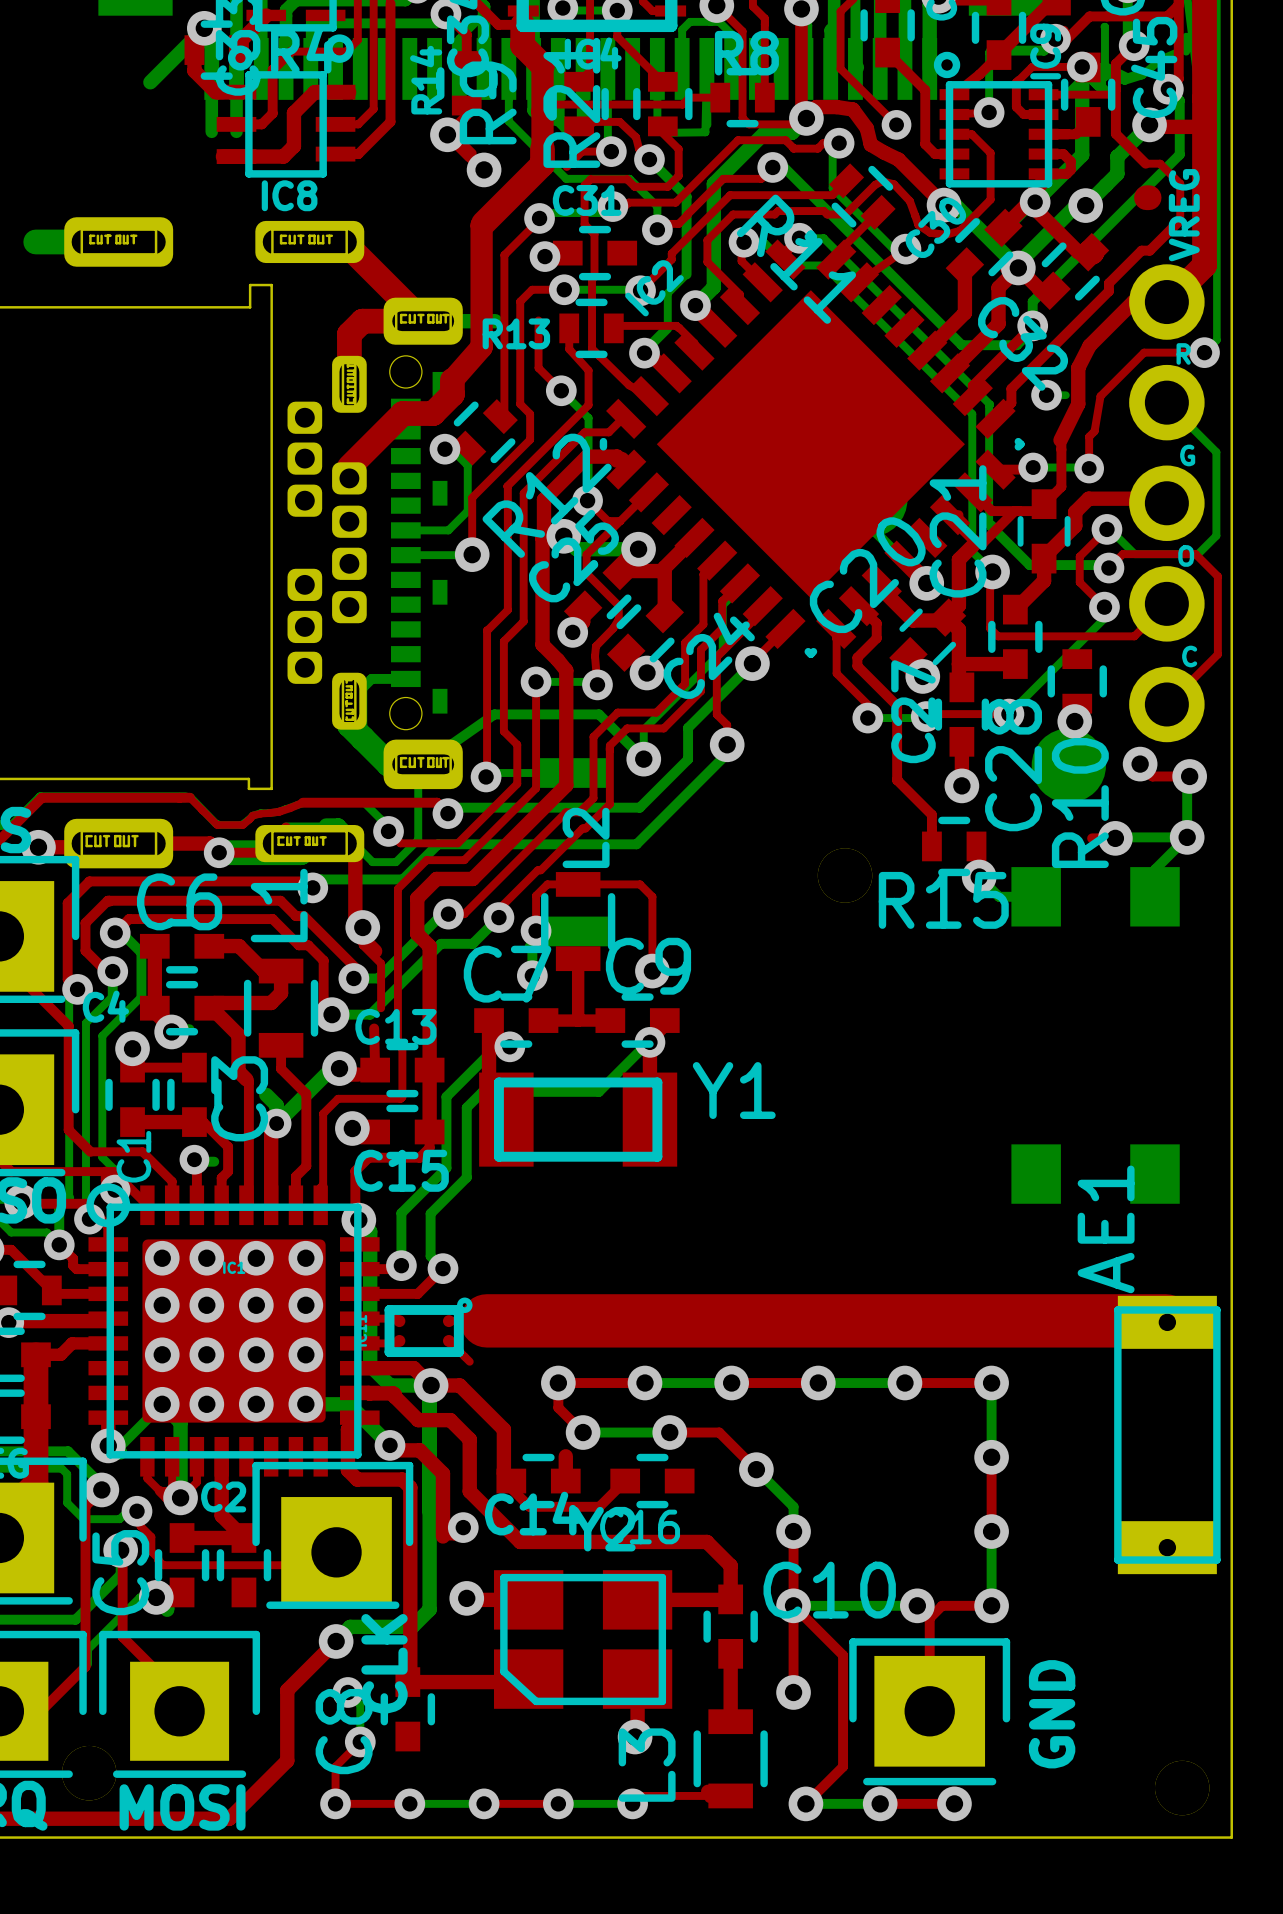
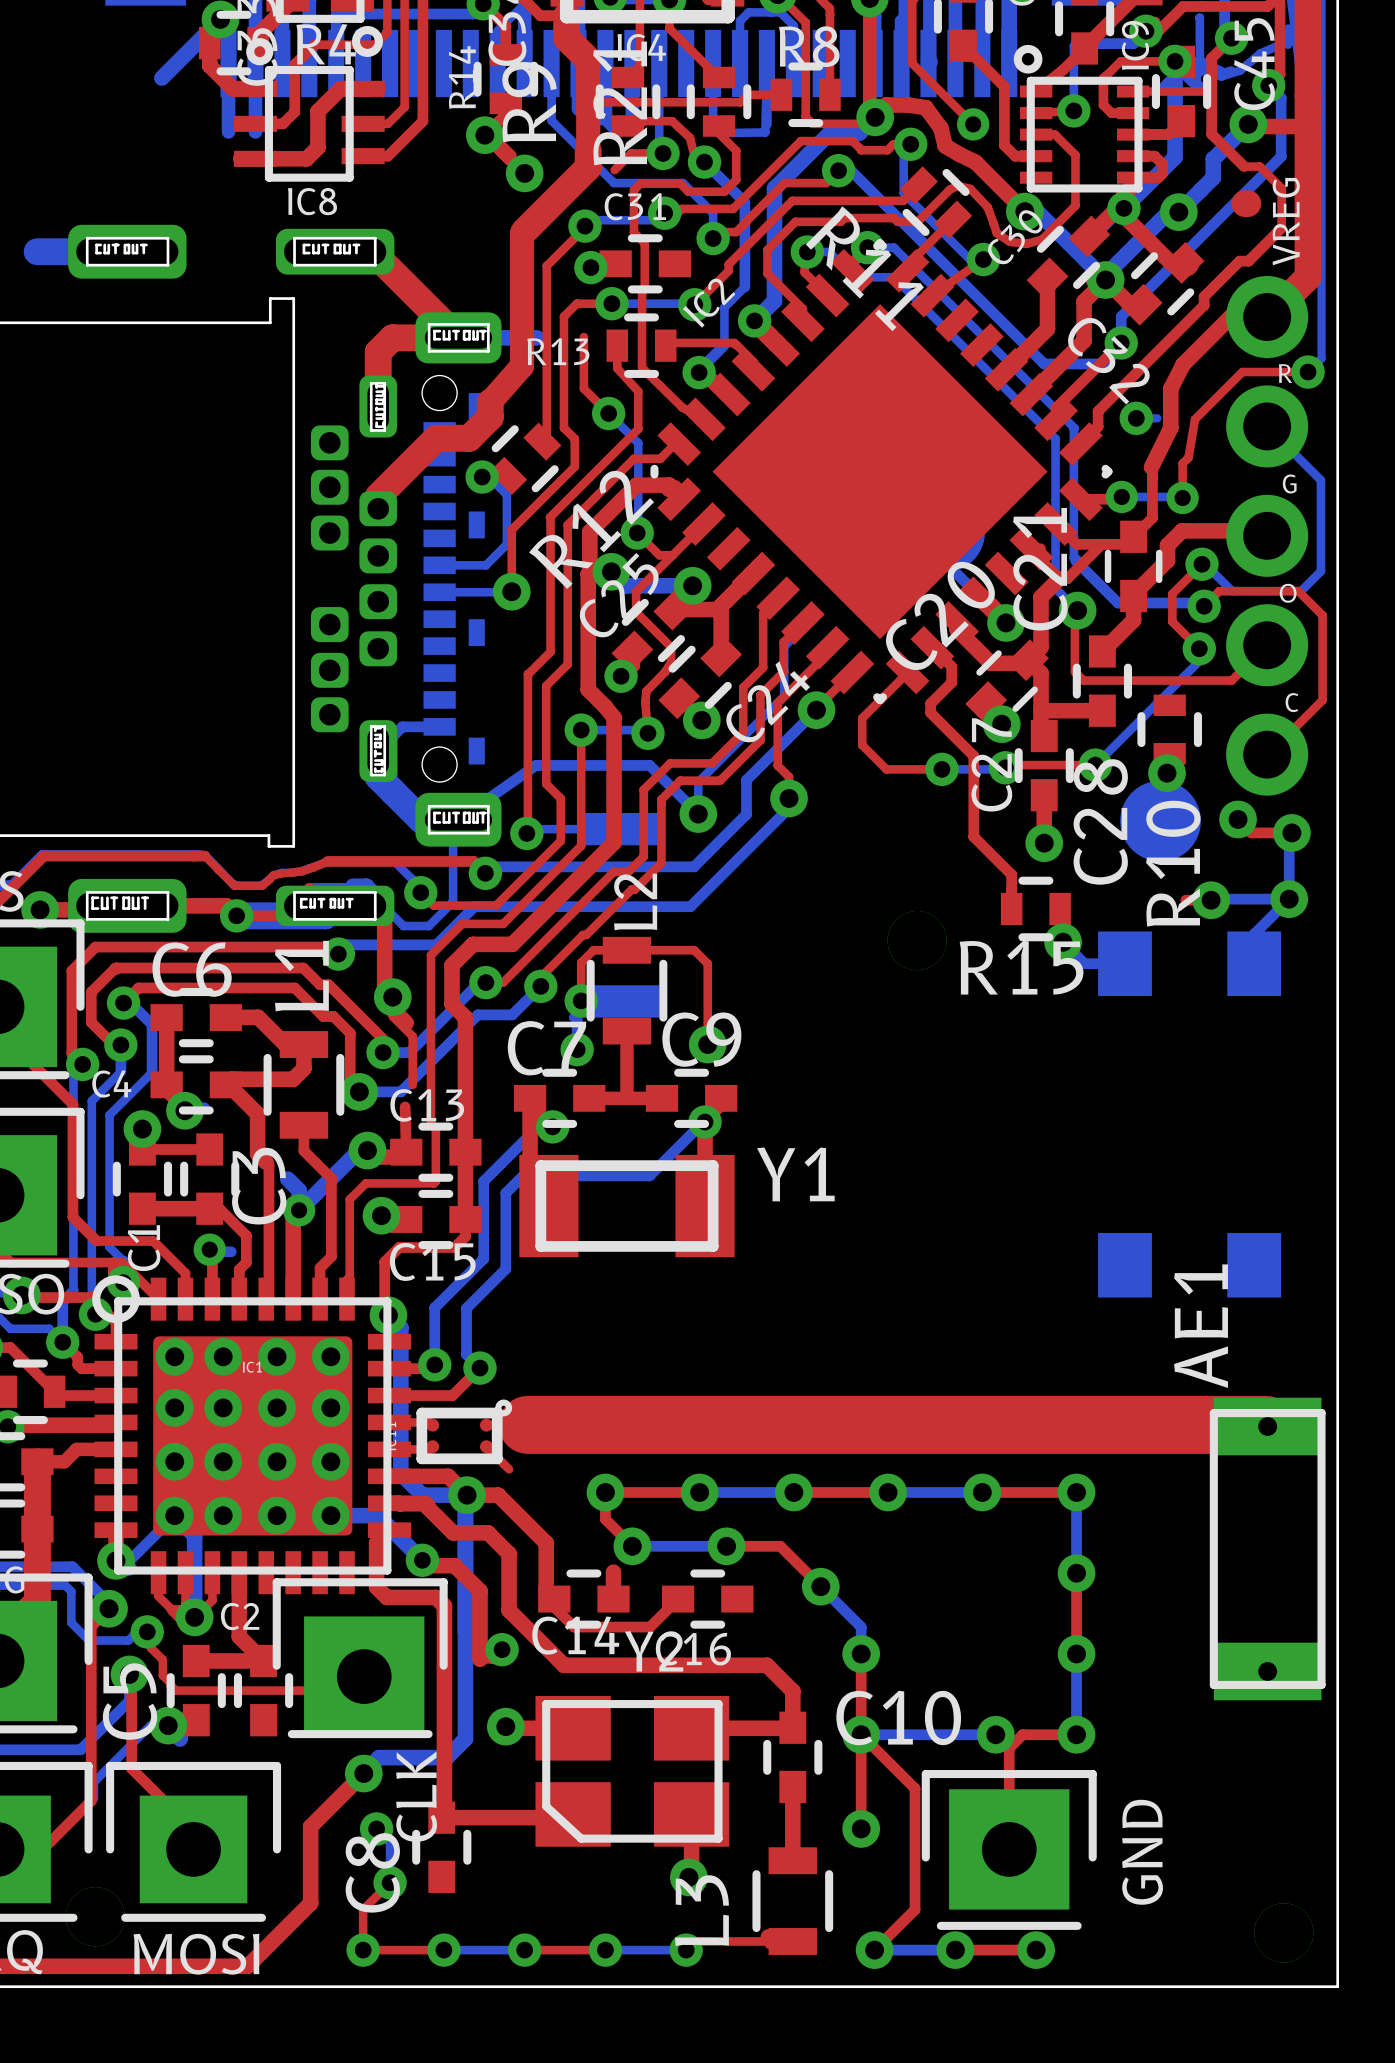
top track: (836, 638) (836, 673) (867, 704) (867, 718) -> (907, 672) (862, 718) (862, 745) (886, 769) (941, 769)

